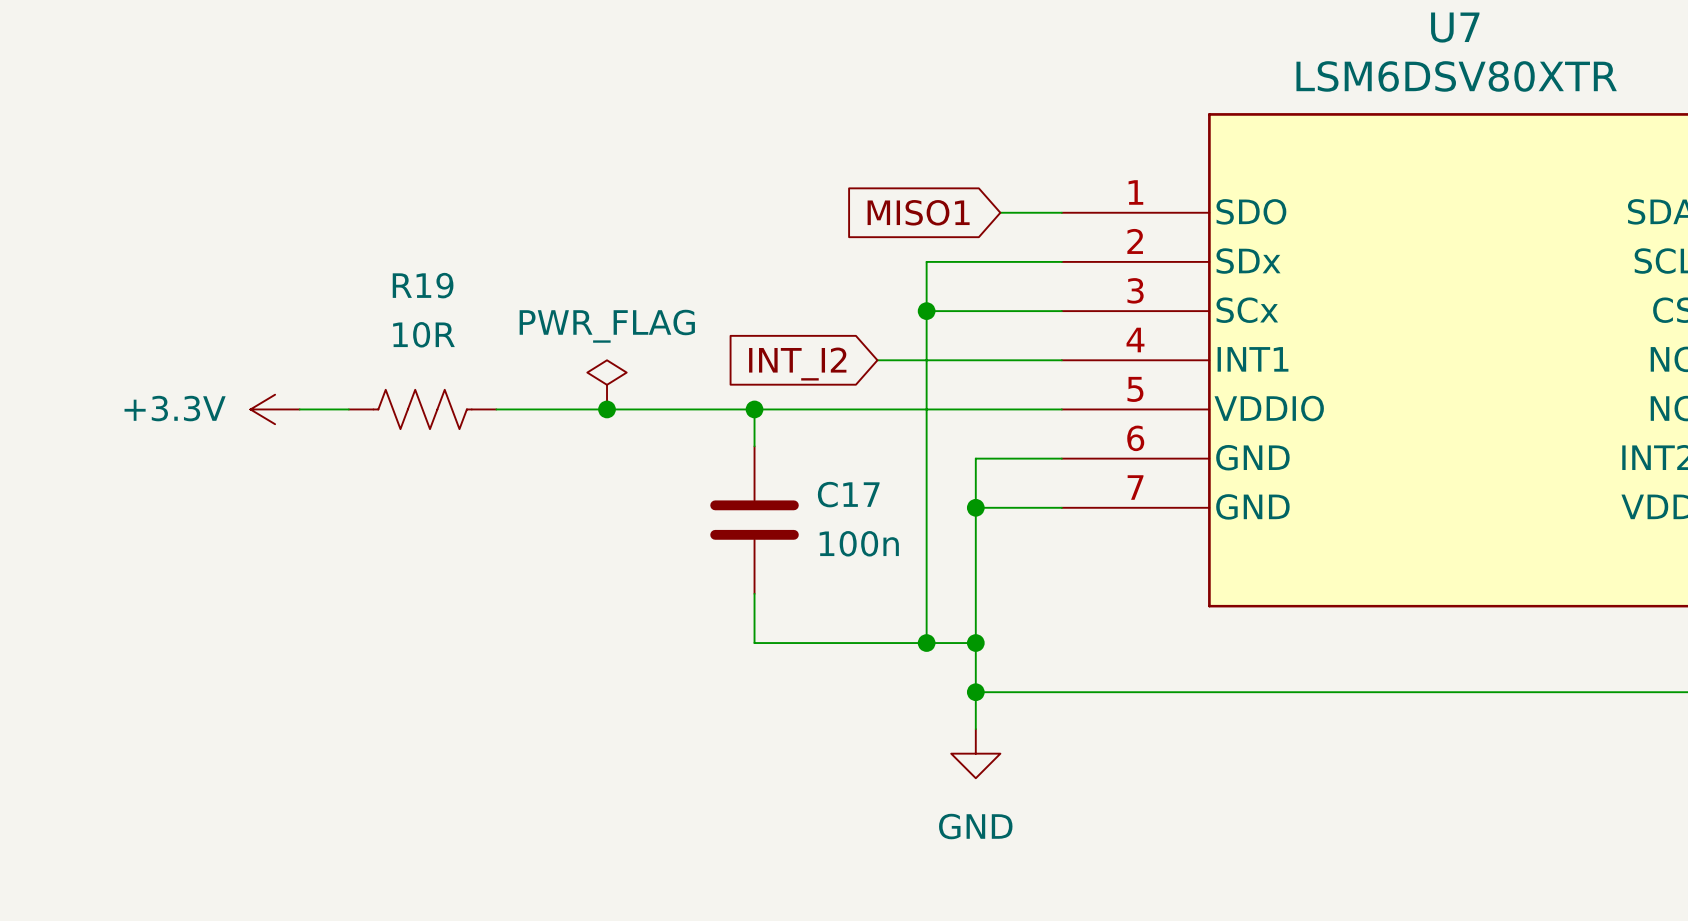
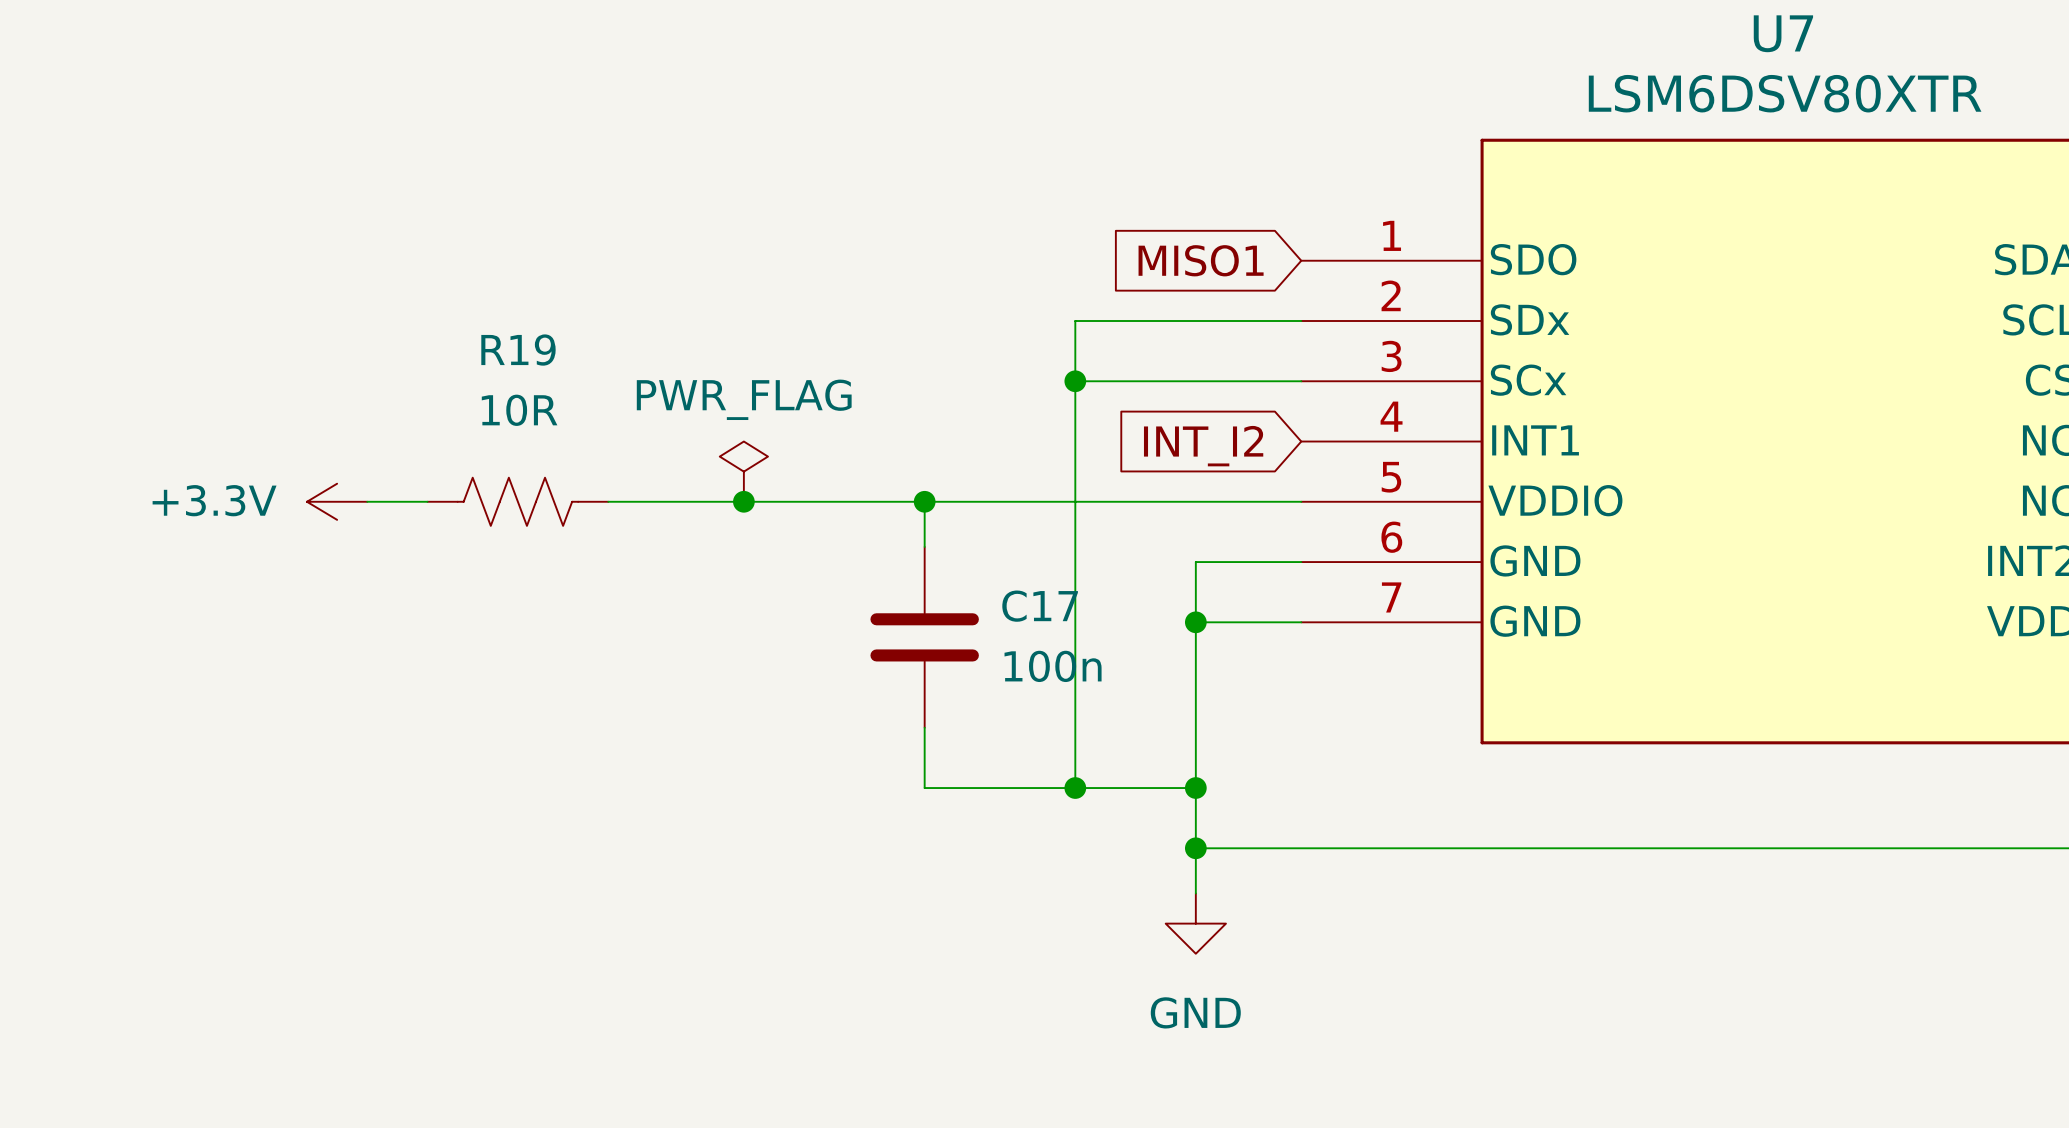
global label position: MISO1 (918, 212) -> MISO1 (1201, 260)
wire: (1000, 212) (1061, 212) -> none
wire: (926, 261) (926, 643) -> (1135, 321) (1075, 321) (1075, 788)
wire: none -> (1075, 381) (1135, 381)
junction position: (926, 311) -> (1075, 381)
wire: (877, 360) (1061, 360) -> none
global label position: INT_I2 (797, 364) -> INT_I2 (1203, 446)
junction position: (926, 643) -> (1075, 788)

